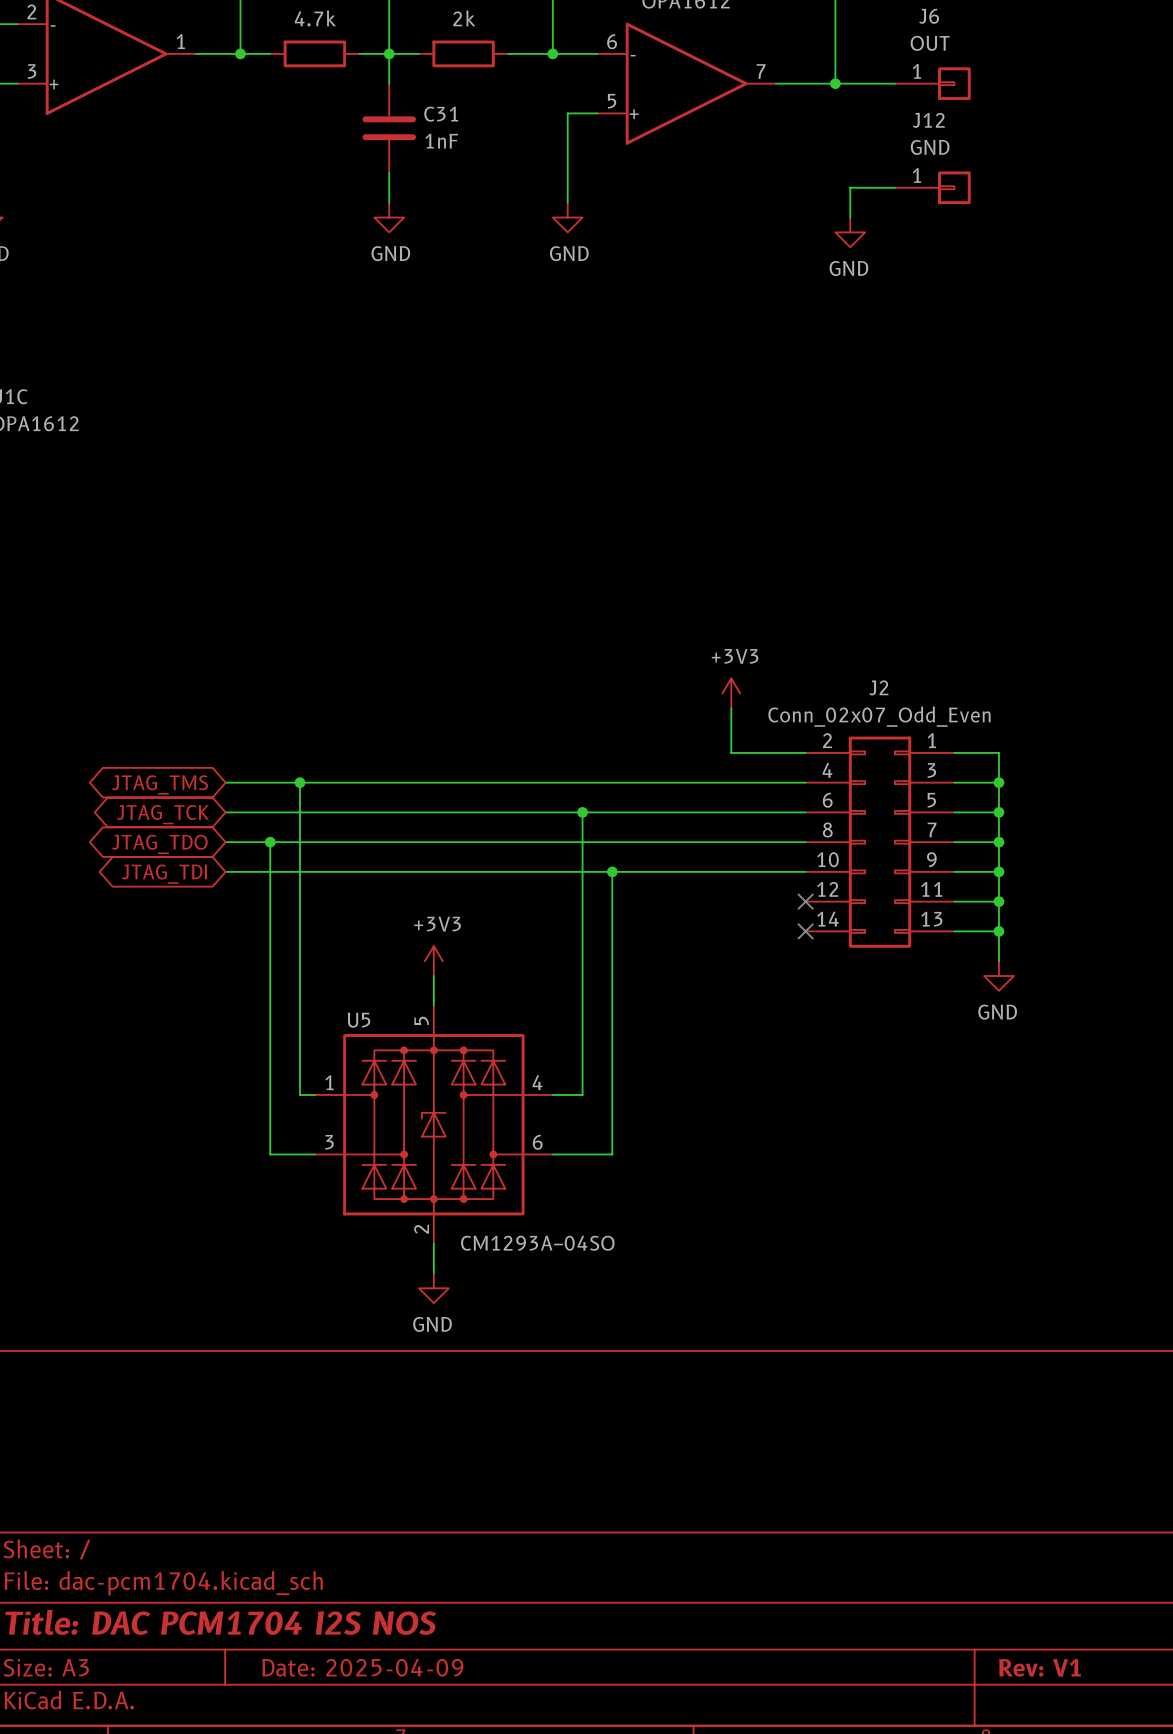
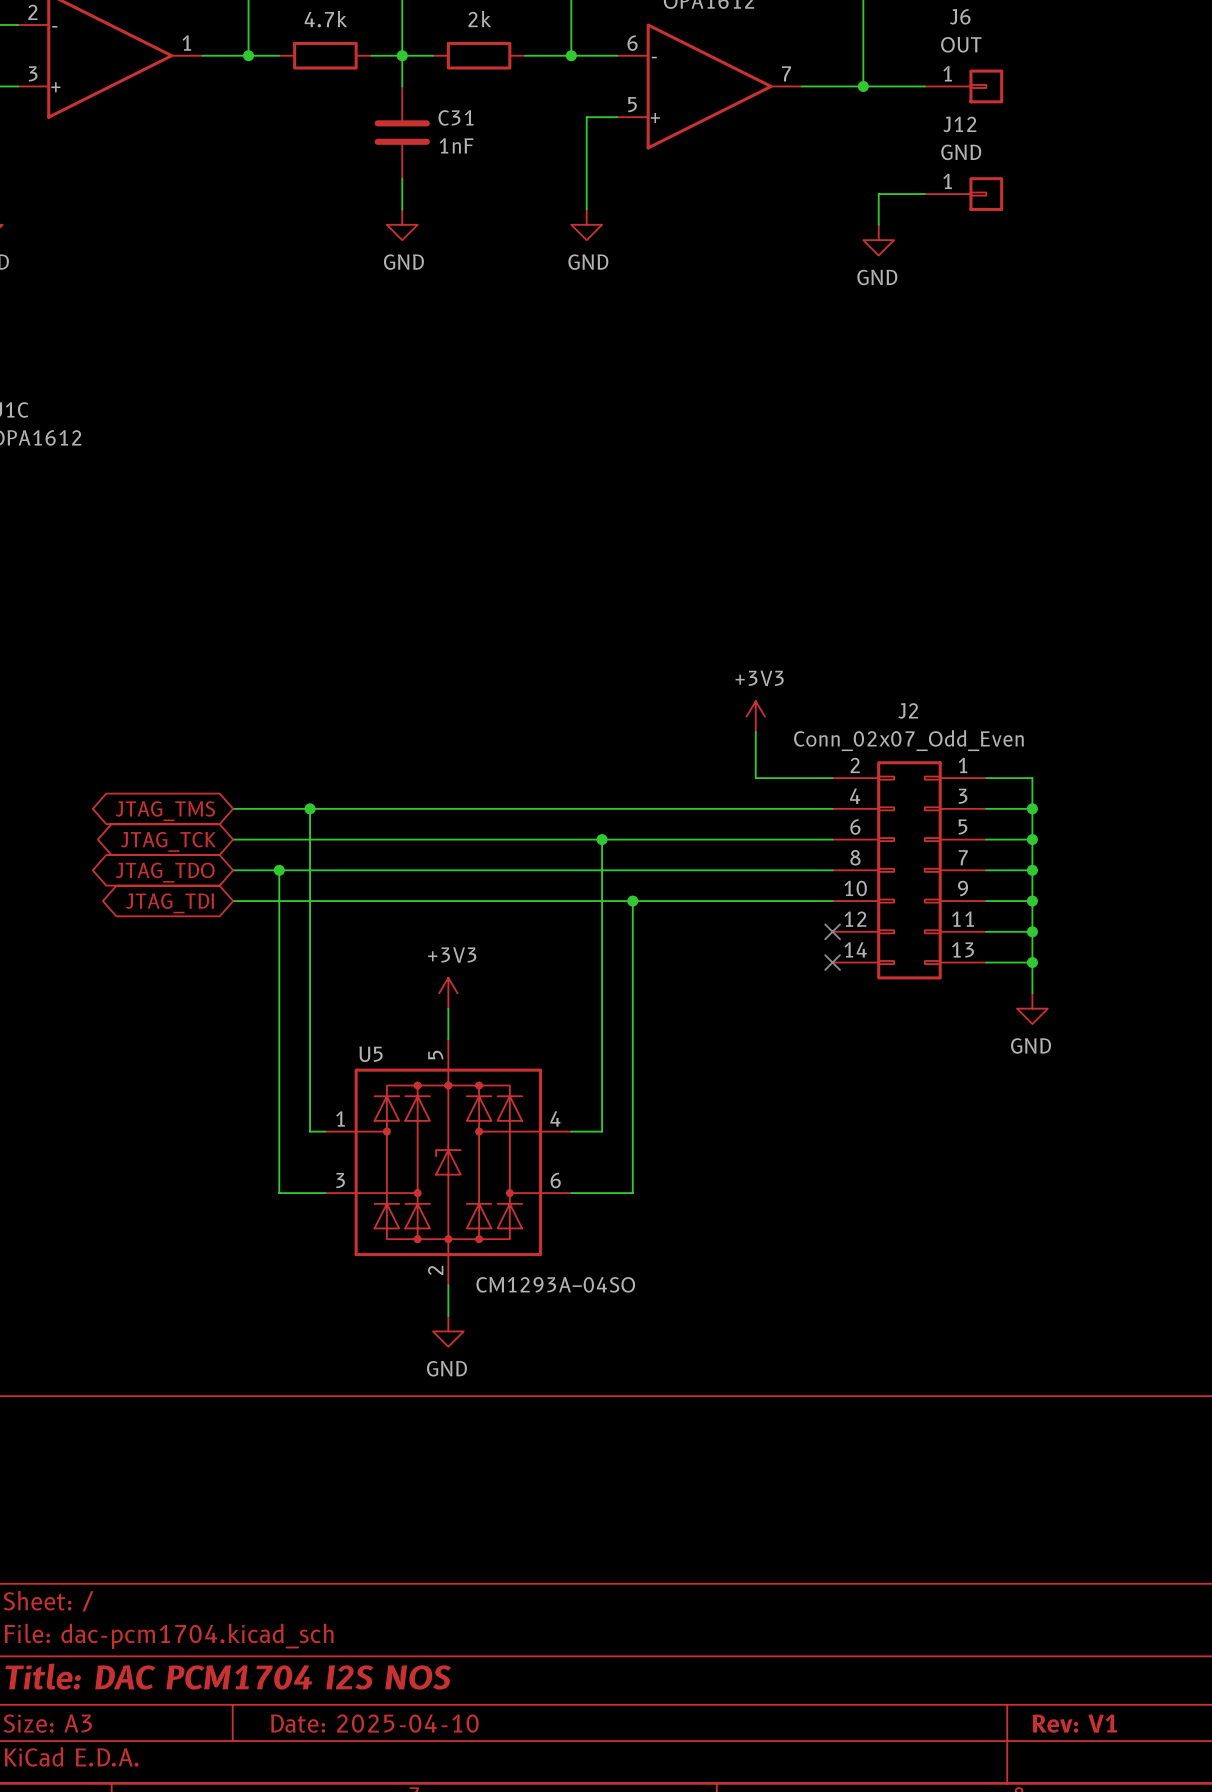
title block: Date: 2025-04-09 (362, 1667) -> Date: 2025-04-10 (374, 1723)

